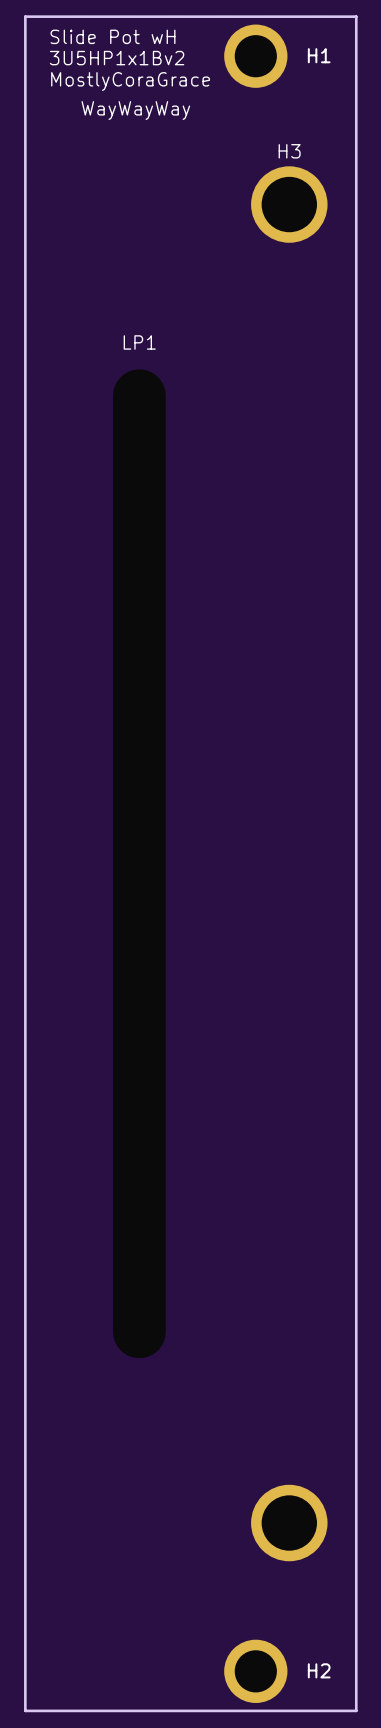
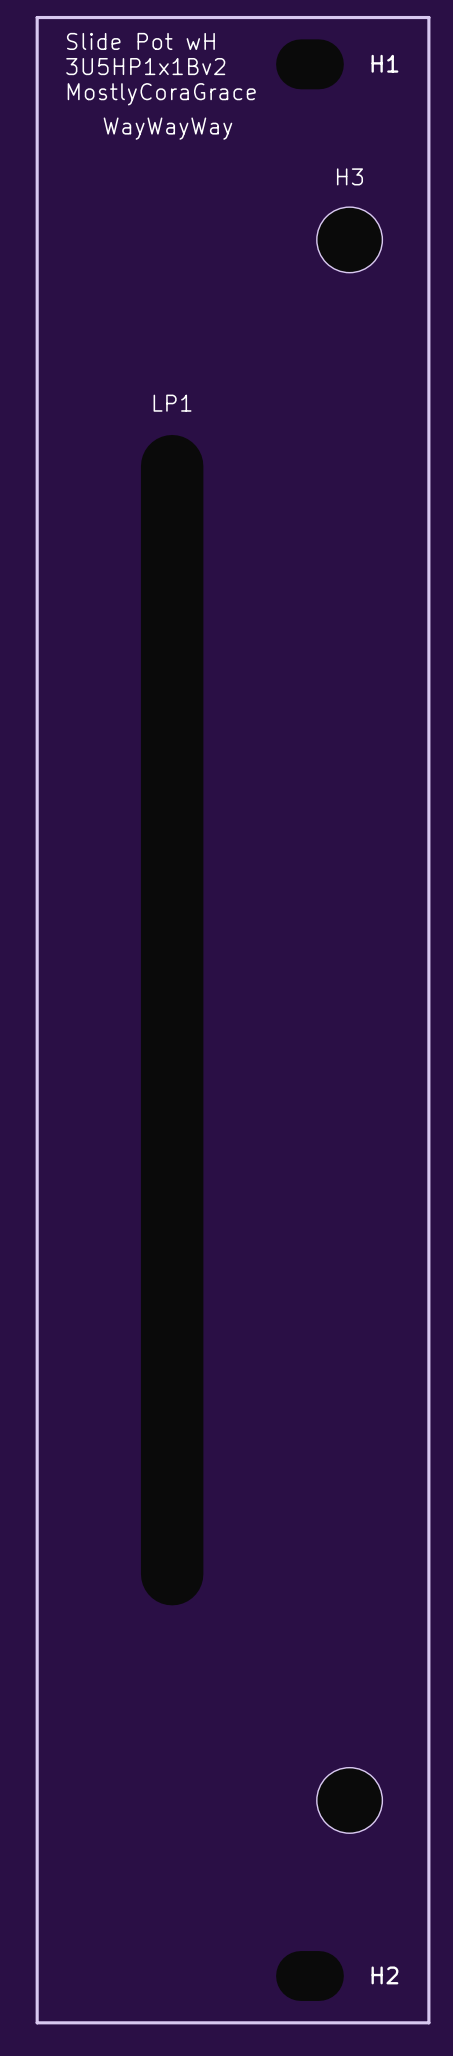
H1 footprint: [224, 24, 288, 88] -> [276, 39, 344, 90]
H3 footprint: [251, 166, 328, 1562] -> [316, 207, 383, 1834]
H2 footprint: [224, 1639, 288, 1703] -> [276, 1951, 344, 2001]

